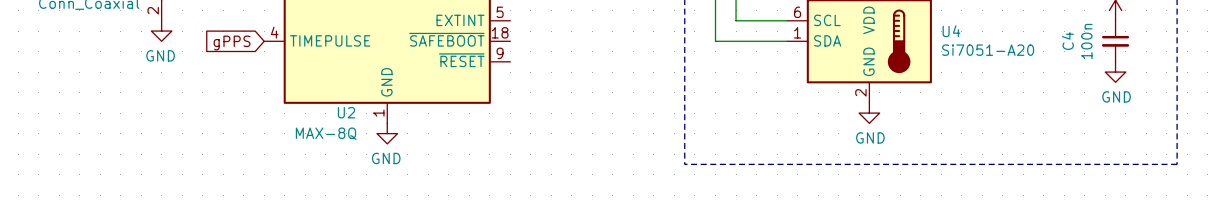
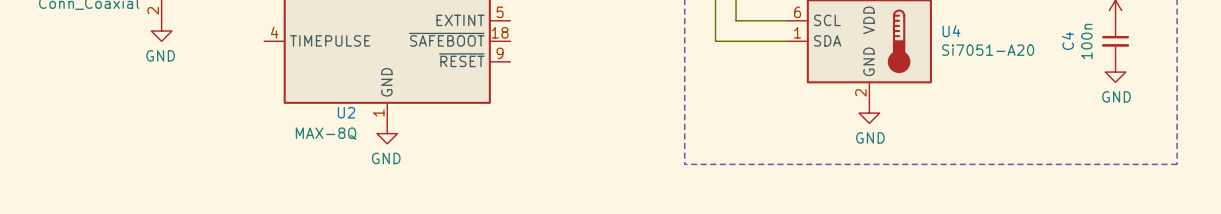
global label: gPPS (232, 43) -> none

